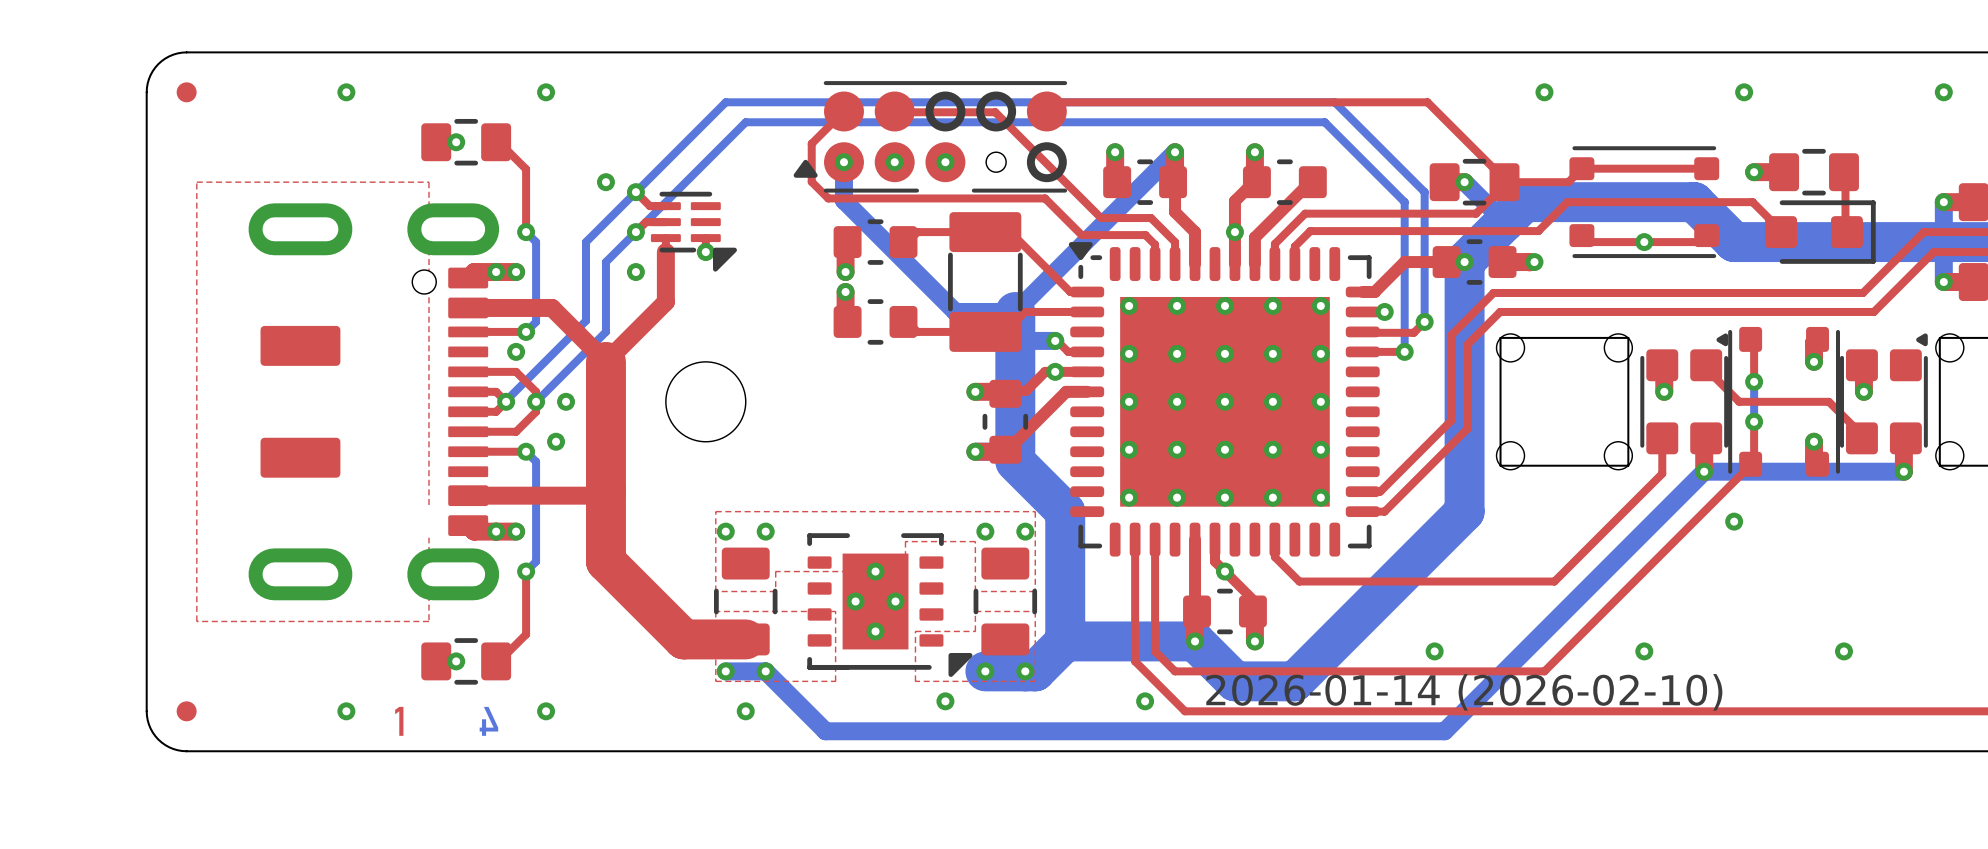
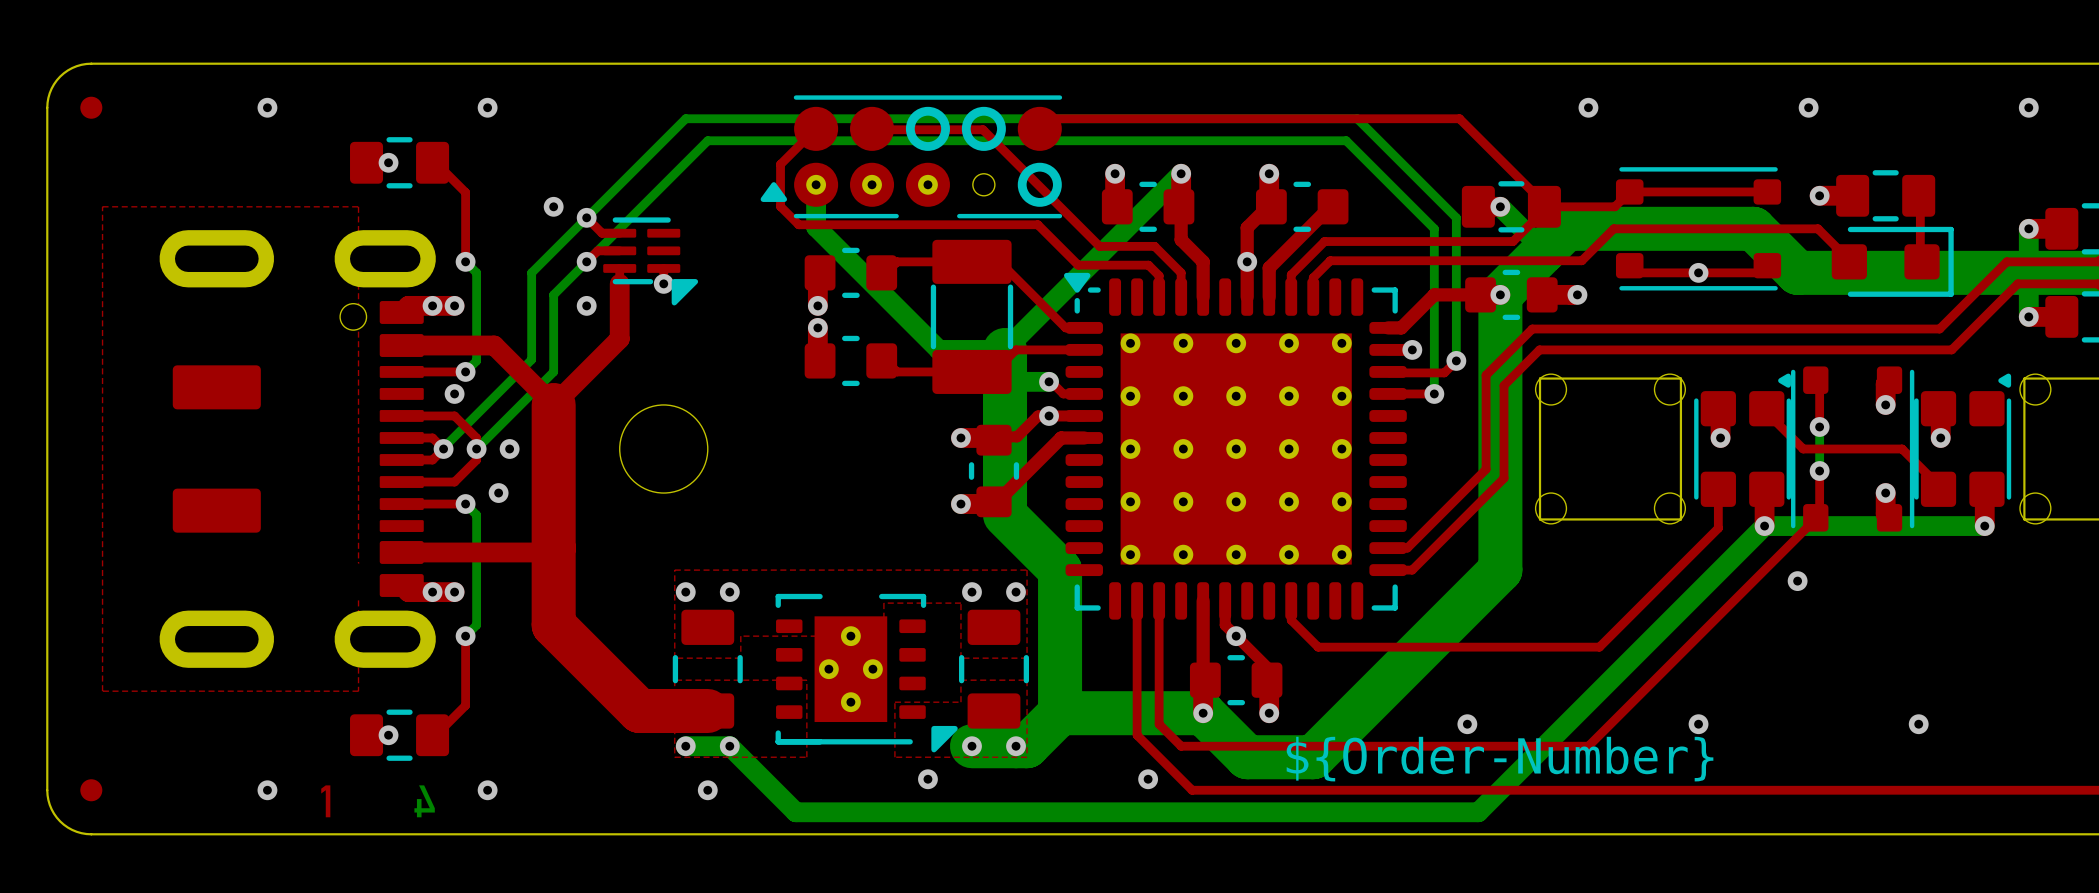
drawing shape: [1206, 674, 1723, 711] -> [1286, 736, 1714, 782]

